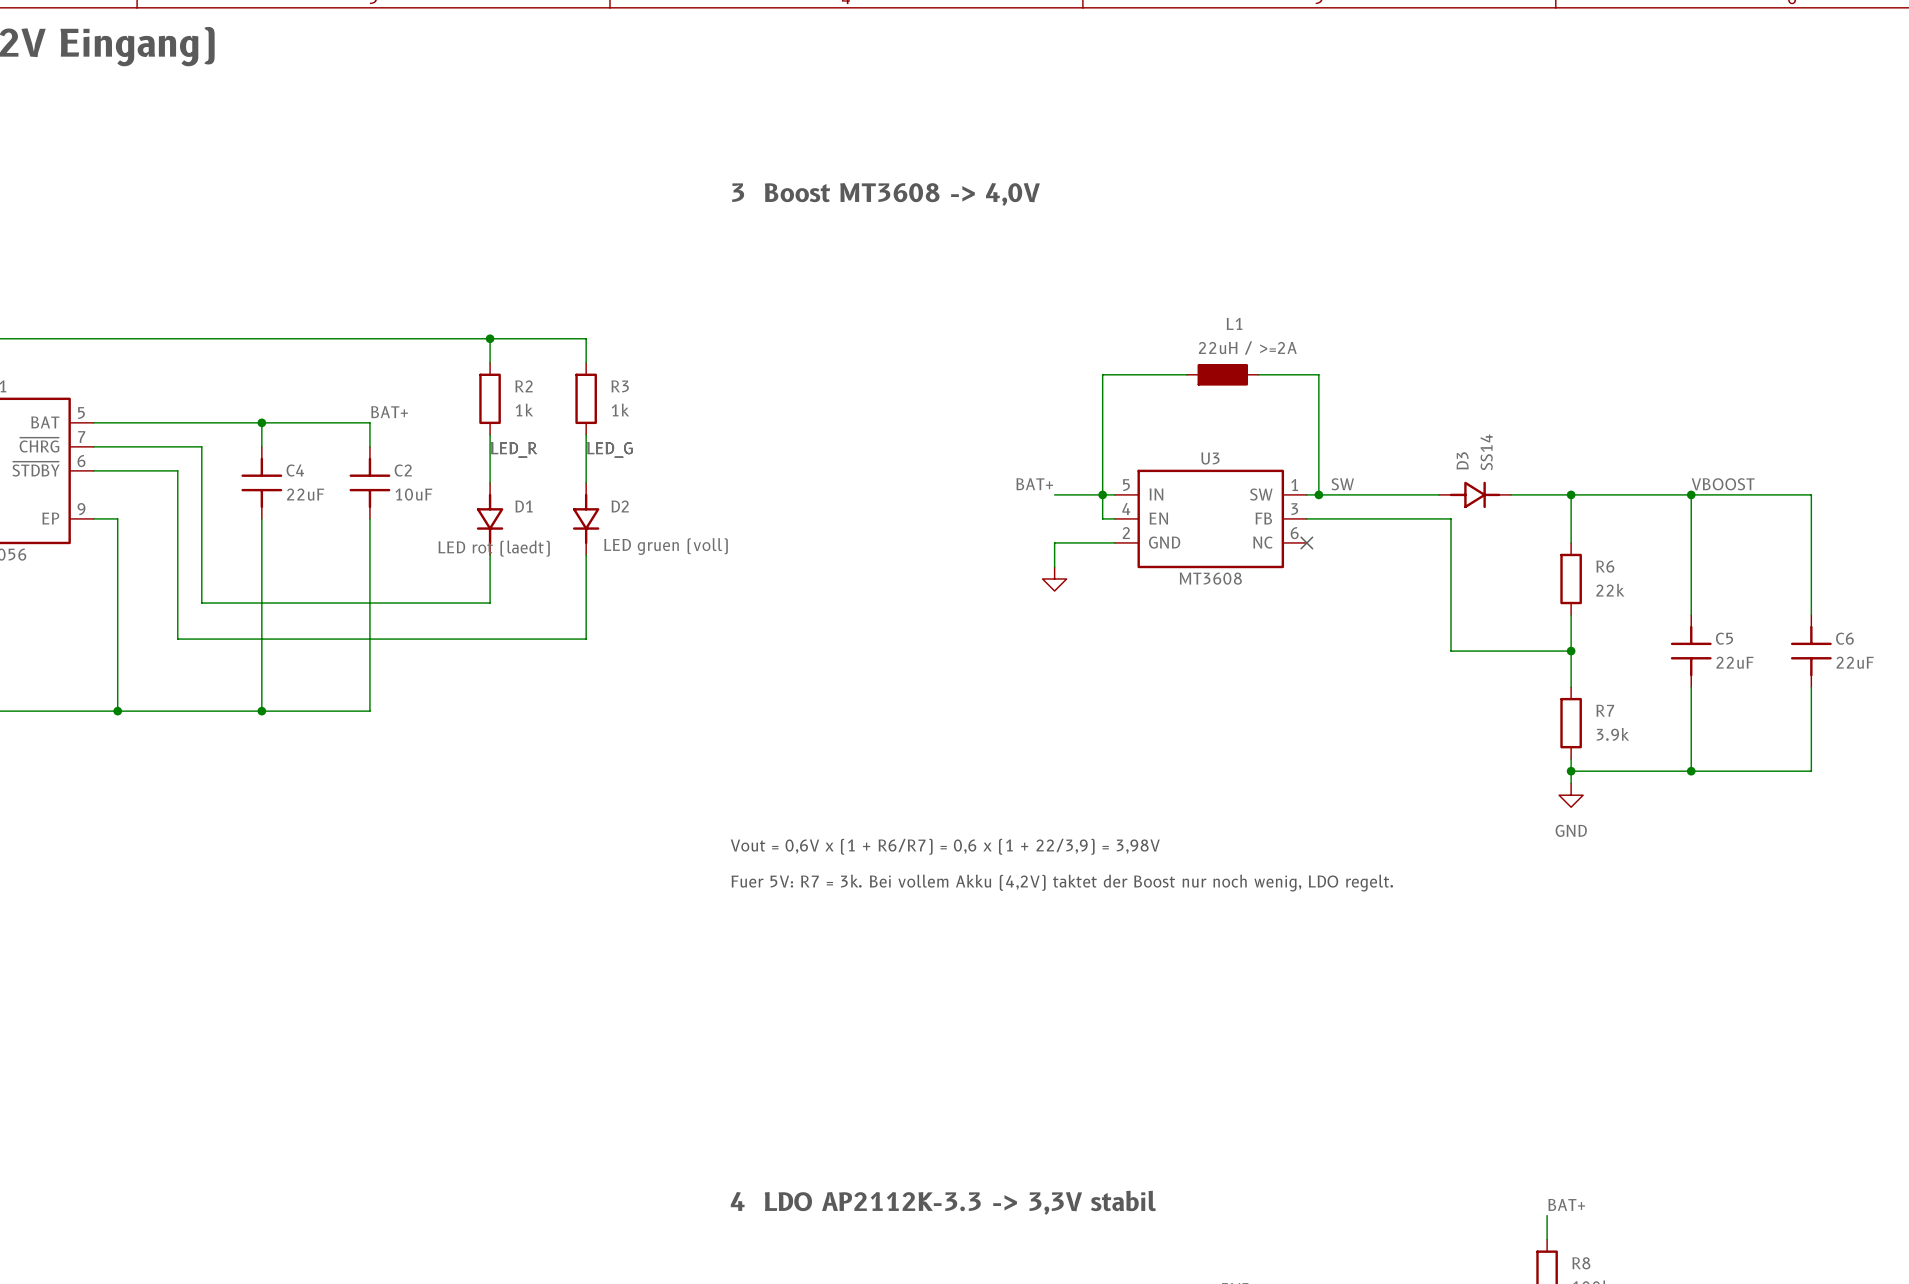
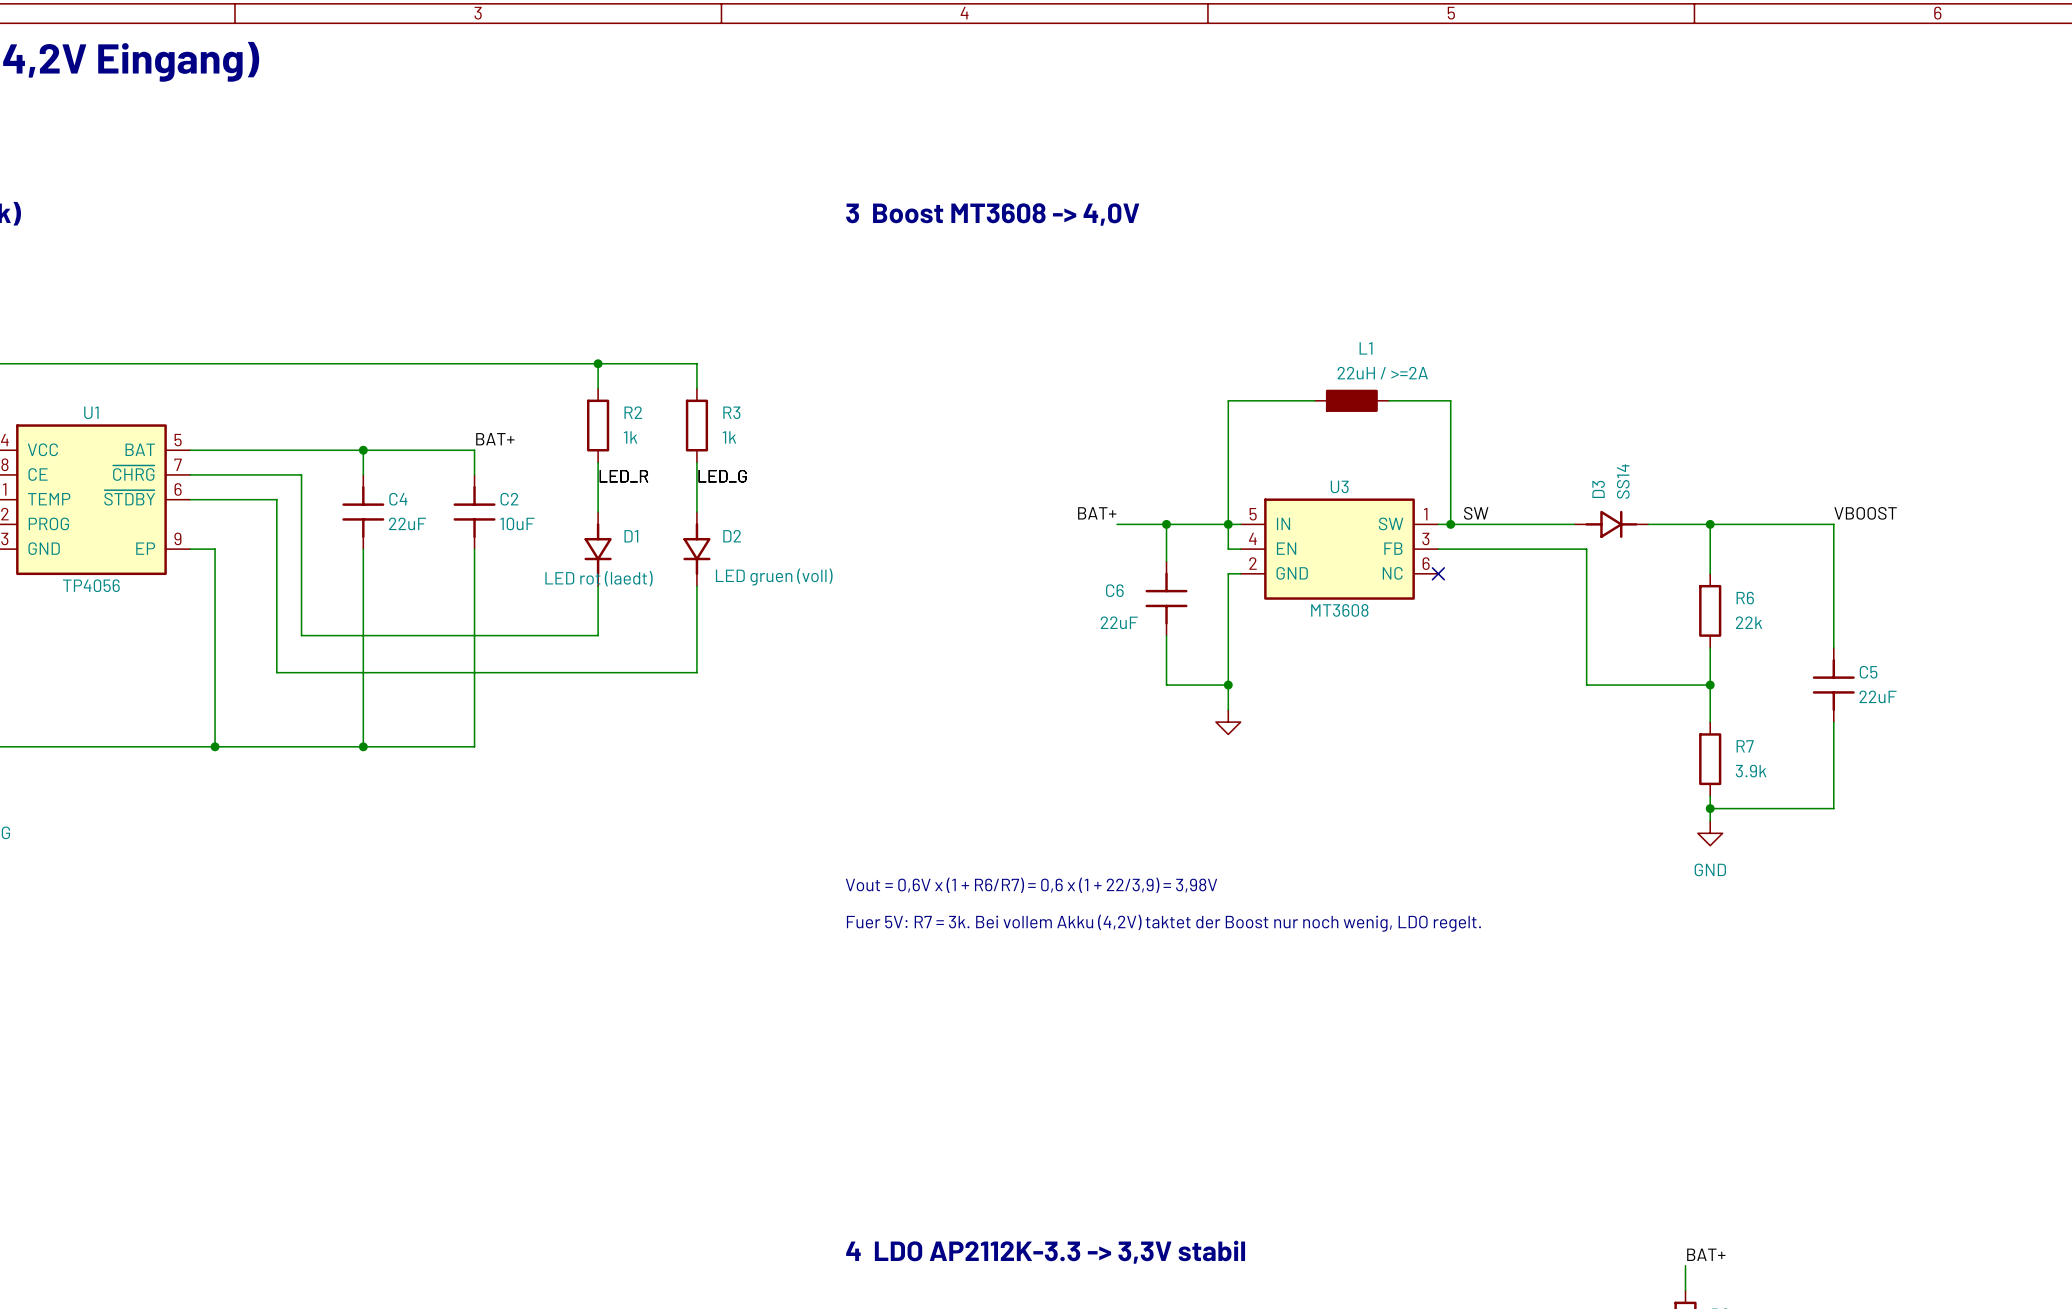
label position: BAT+ (1034, 484) -> BAT+ (1097, 513)
wire: none -> (1117, 524) (1178, 524)
wire: none -> (1166, 524) (1166, 561)
junction: none -> (1166, 524)
wire: (1691, 494) (1811, 494) (1811, 615) -> none
junction: (1691, 494) -> none
wire: (1102, 542) (1054, 542) (1054, 566) -> (1228, 573) (1228, 709)
power symbol position: (1054, 579) -> (1228, 722)
wire: none -> (1166, 635) (1166, 685) (1228, 685)
C6 name position: C6 (1844, 638) -> C6 (1114, 590)
junction: none -> (1228, 685)
C6 position: (1811, 651) -> (1166, 598)
C6 value position: 22uF (1855, 662) -> 22uF (1119, 622)
wire: (1811, 687) (1811, 771) (1691, 771) -> none
junction: (1691, 771) -> none

